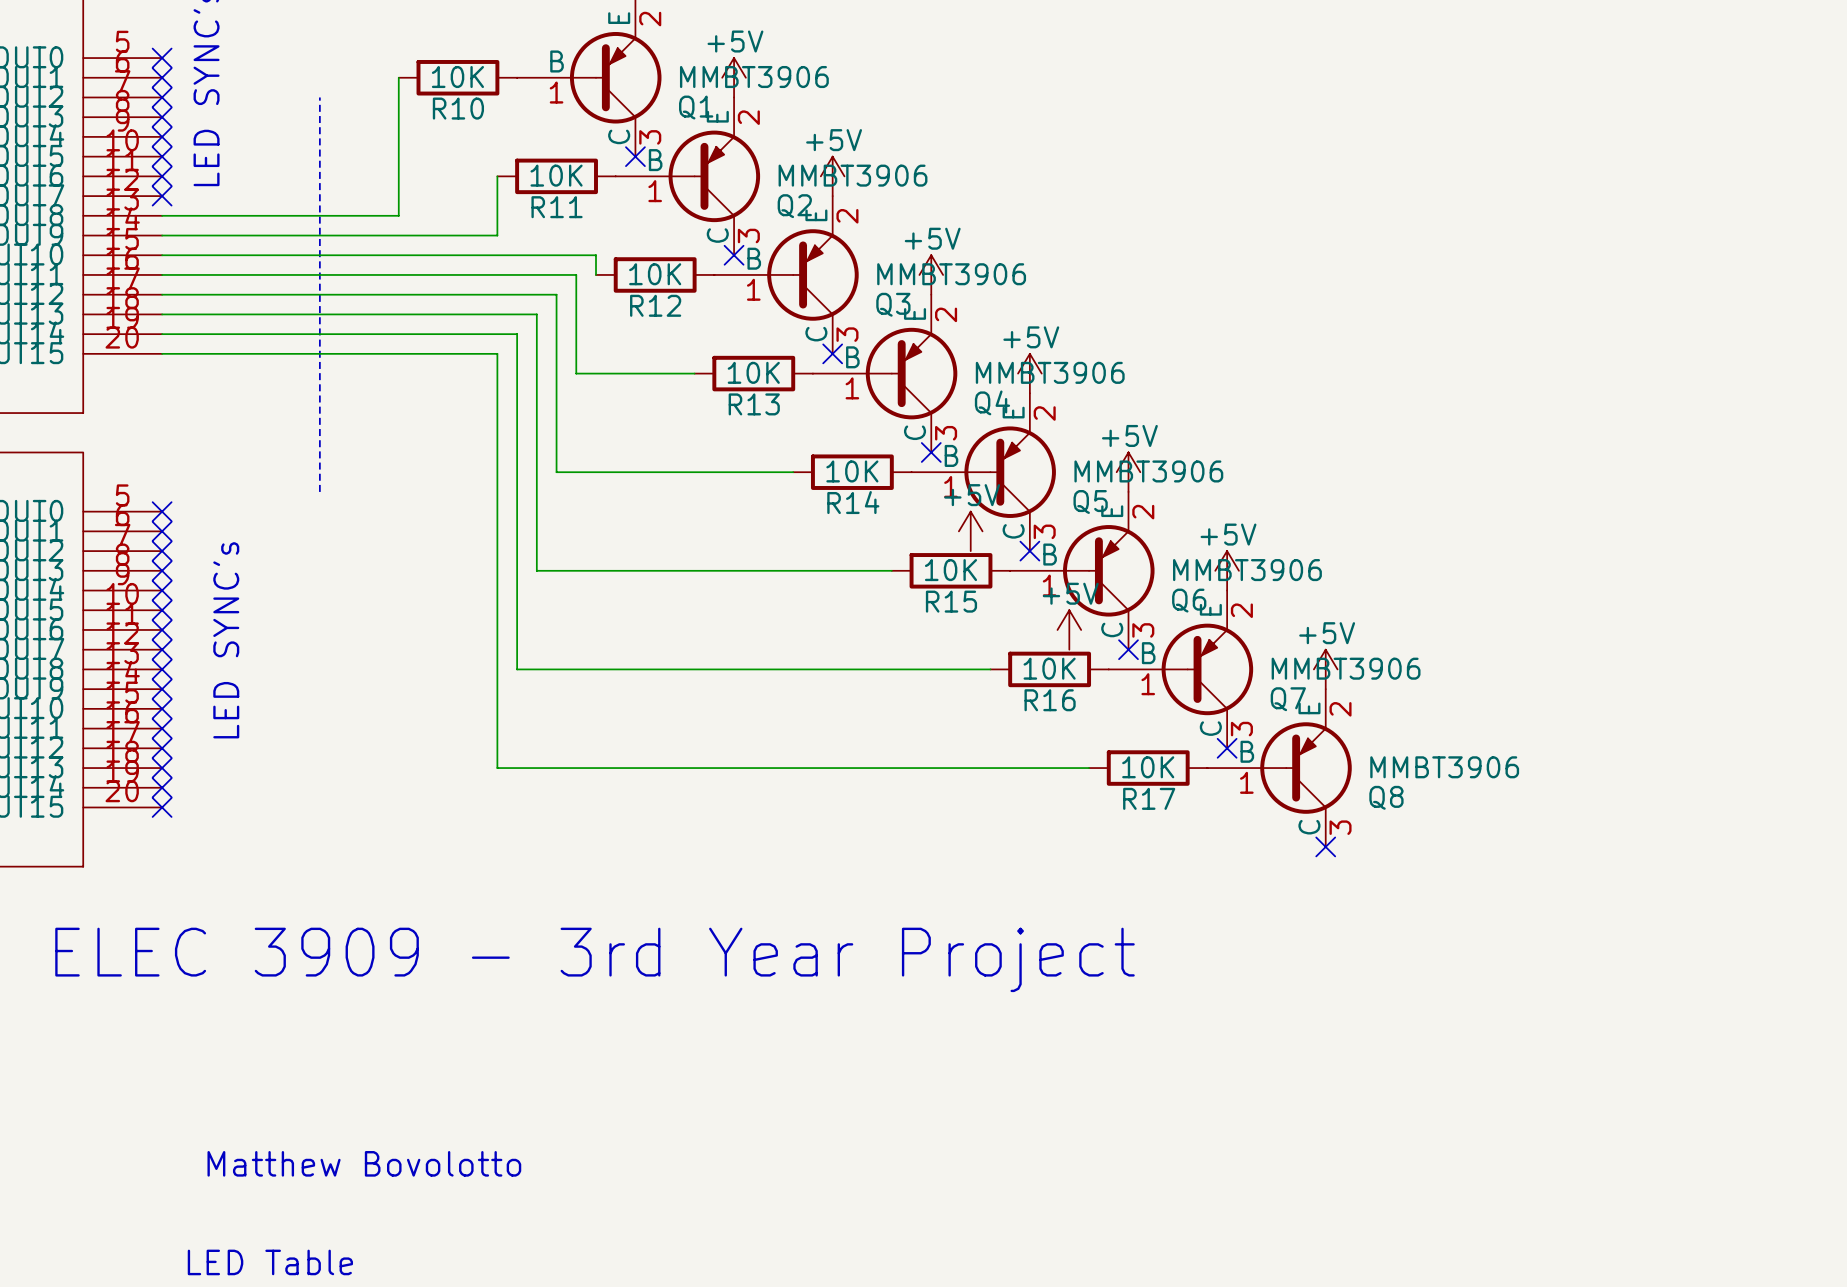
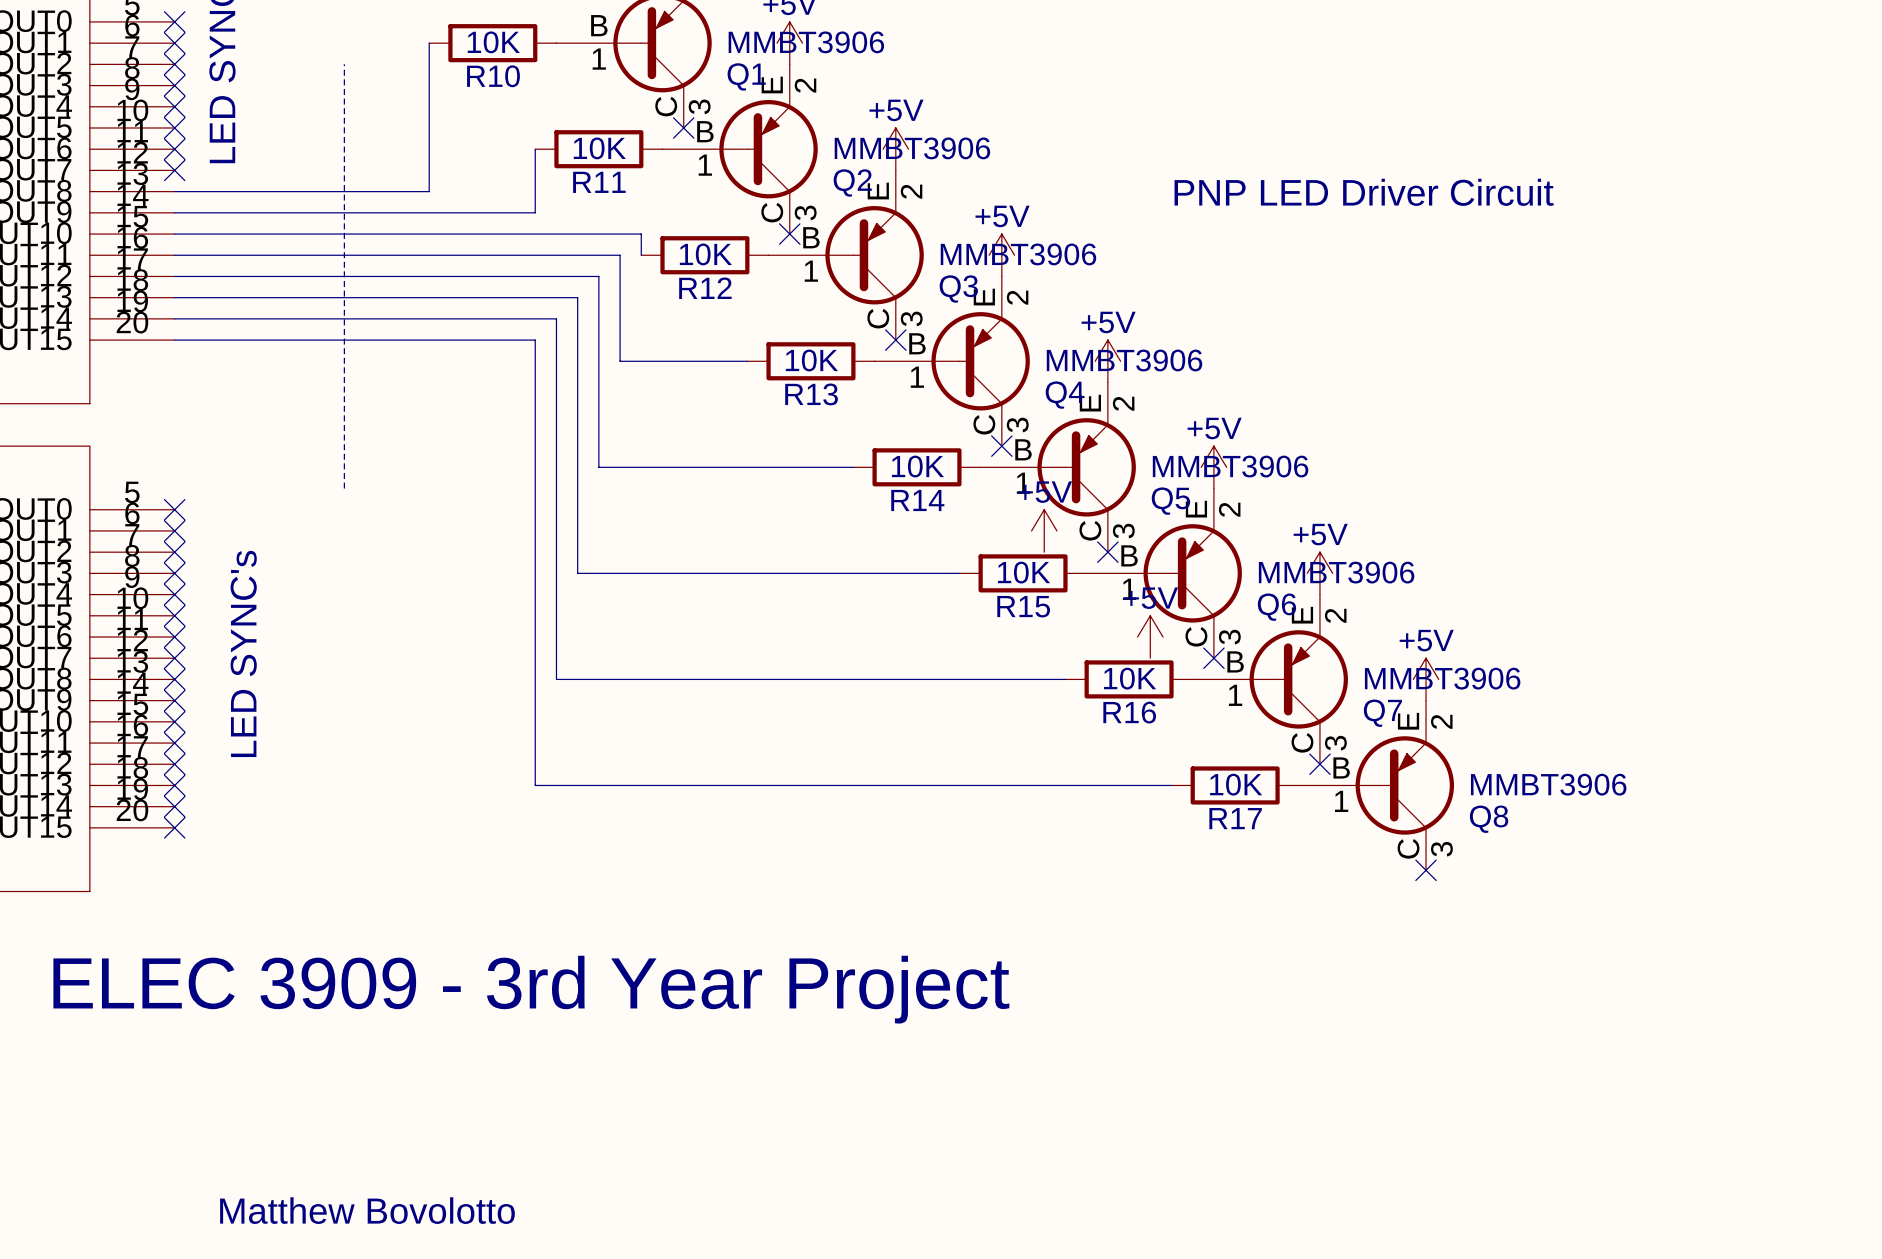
text: none -> PNP LED Driver Circuit (1364, 192)

